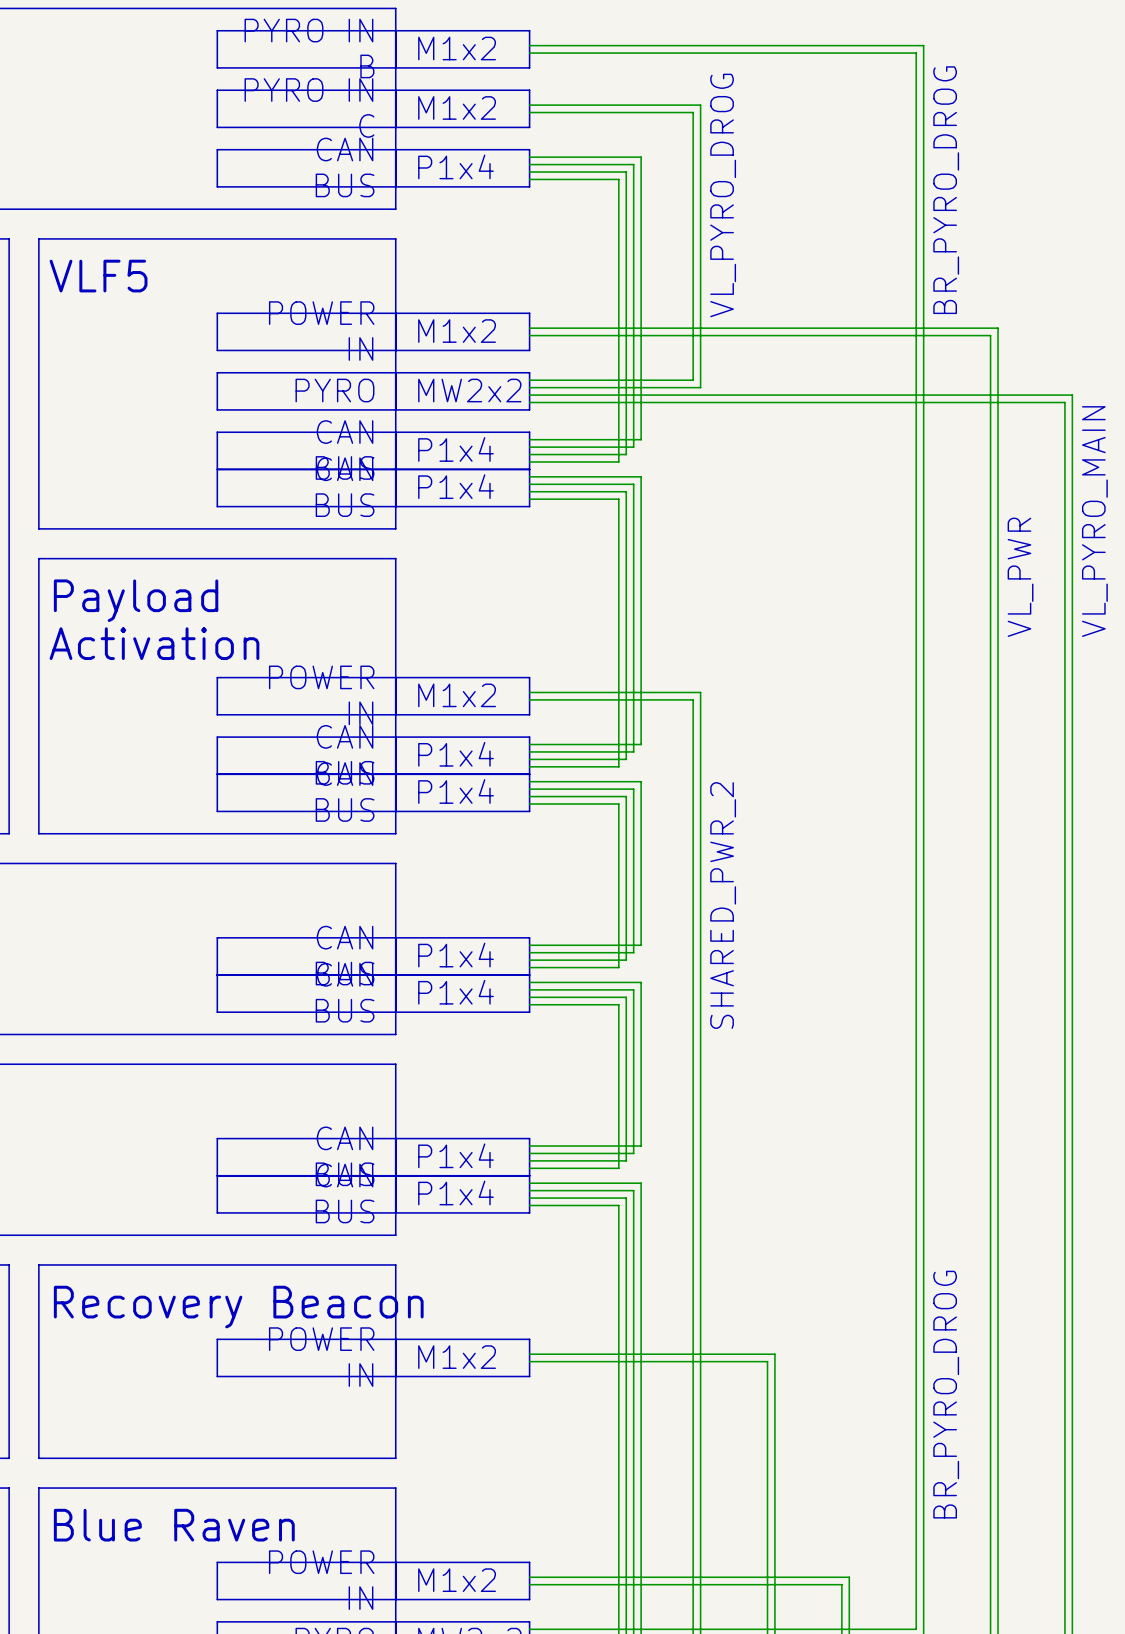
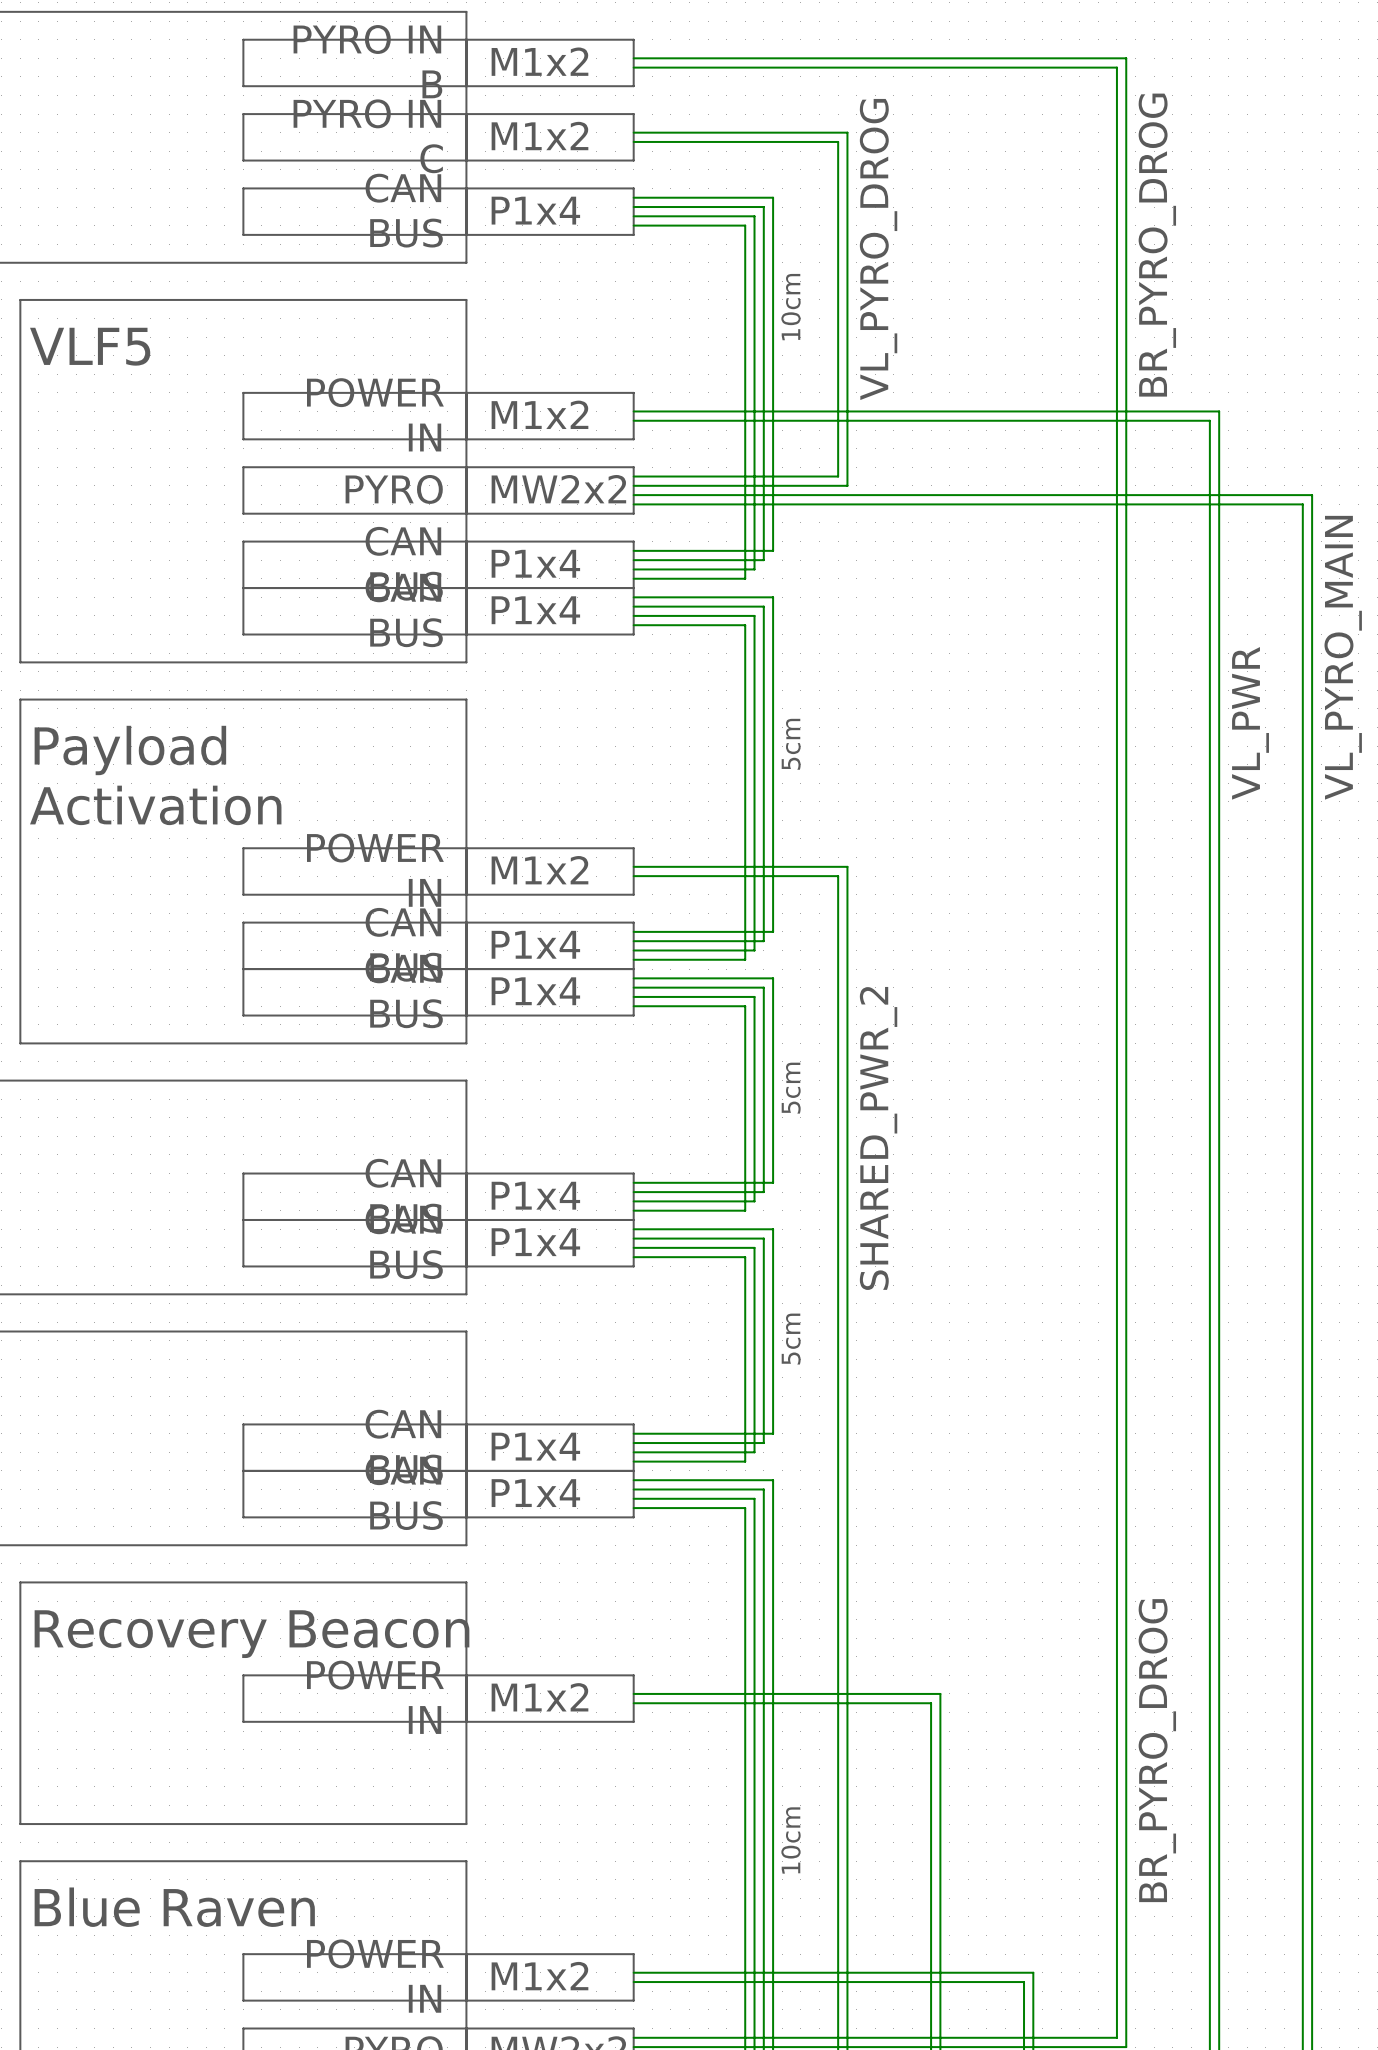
text: none -> 10cm (791, 307)
text: none -> 5cm (791, 744)
text: none -> 5cm (791, 1088)
text: none -> 5cm (791, 1339)
text: none -> 10cm (791, 1840)

